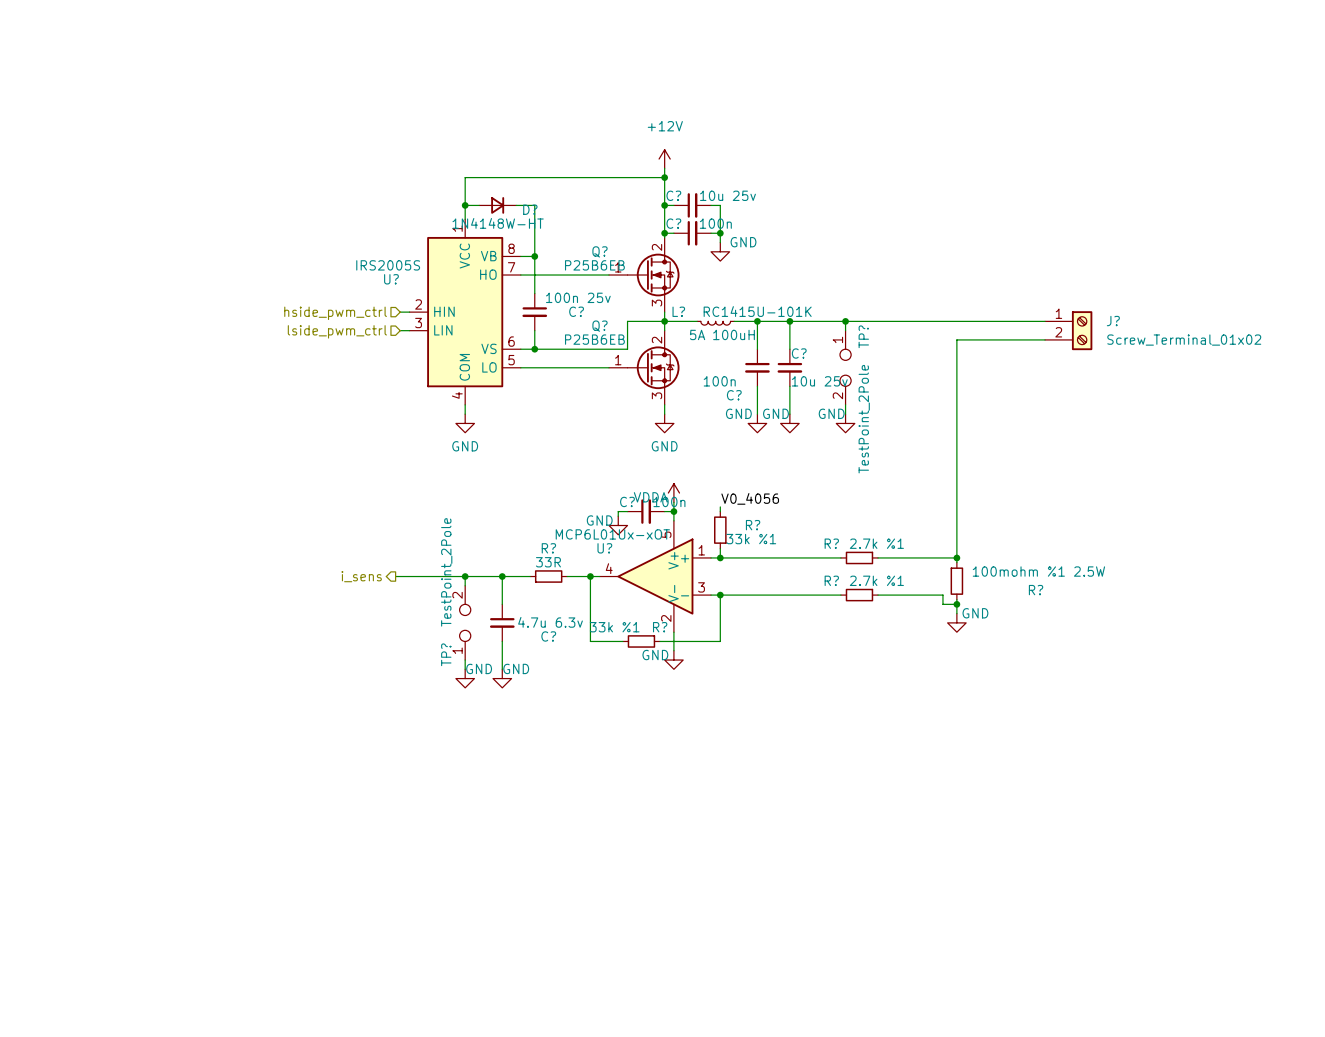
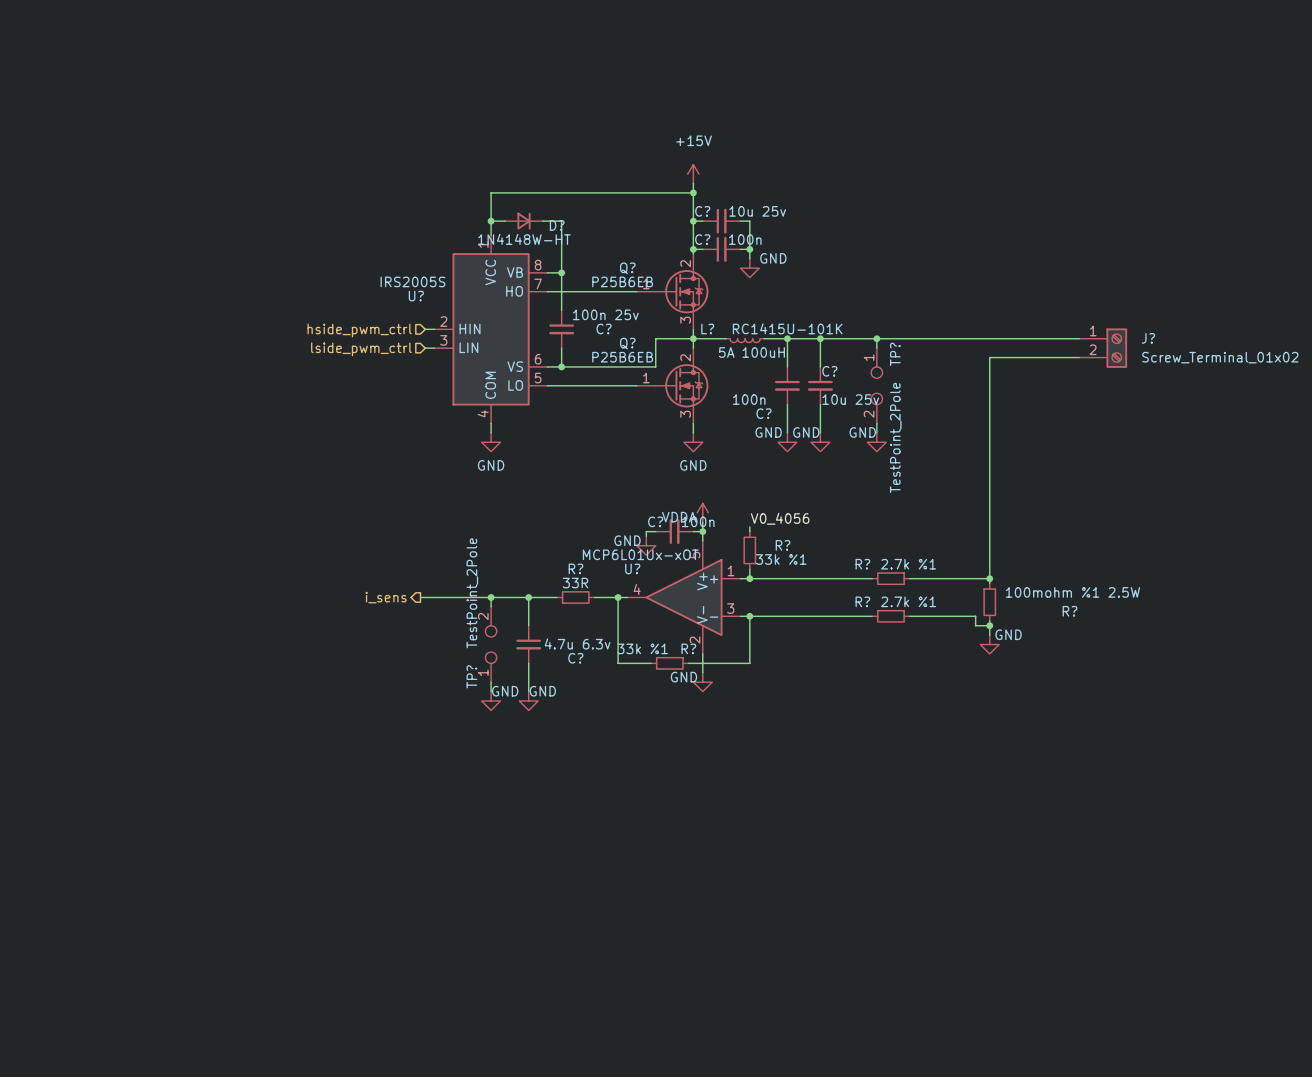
power symbol: +12V (664, 159) -> +15V (693, 174)

